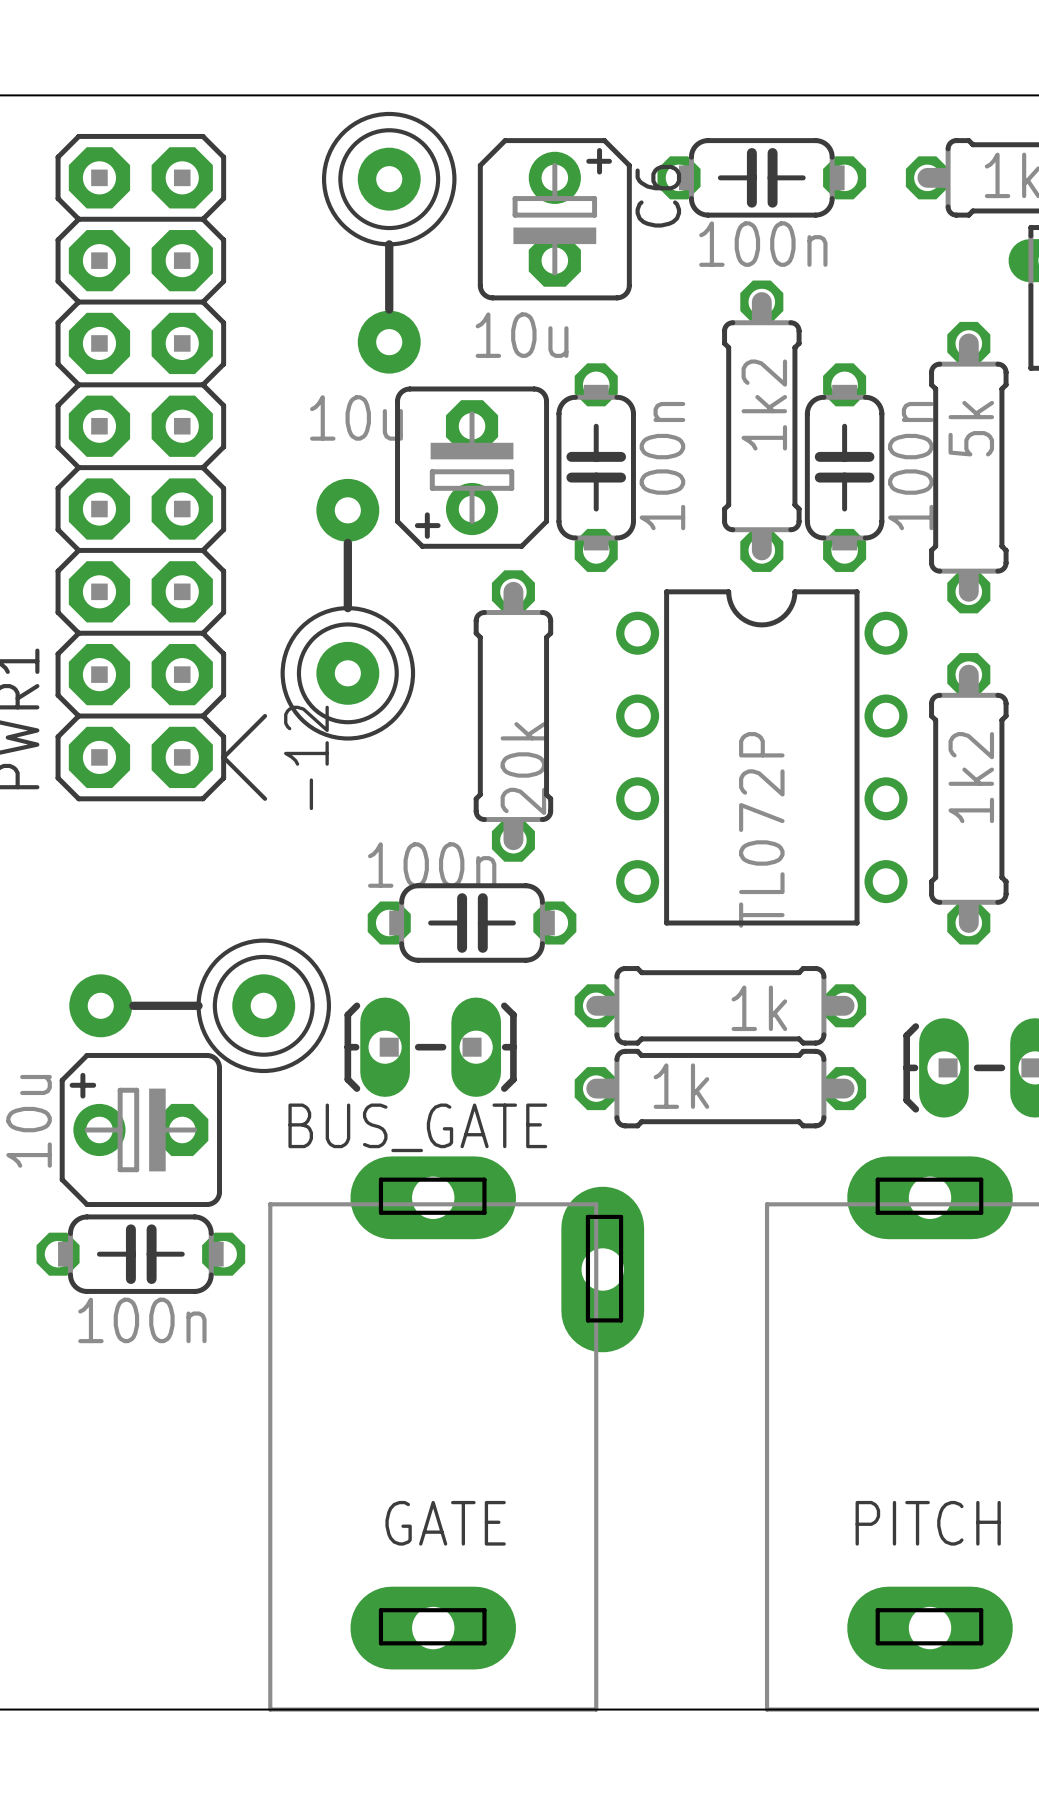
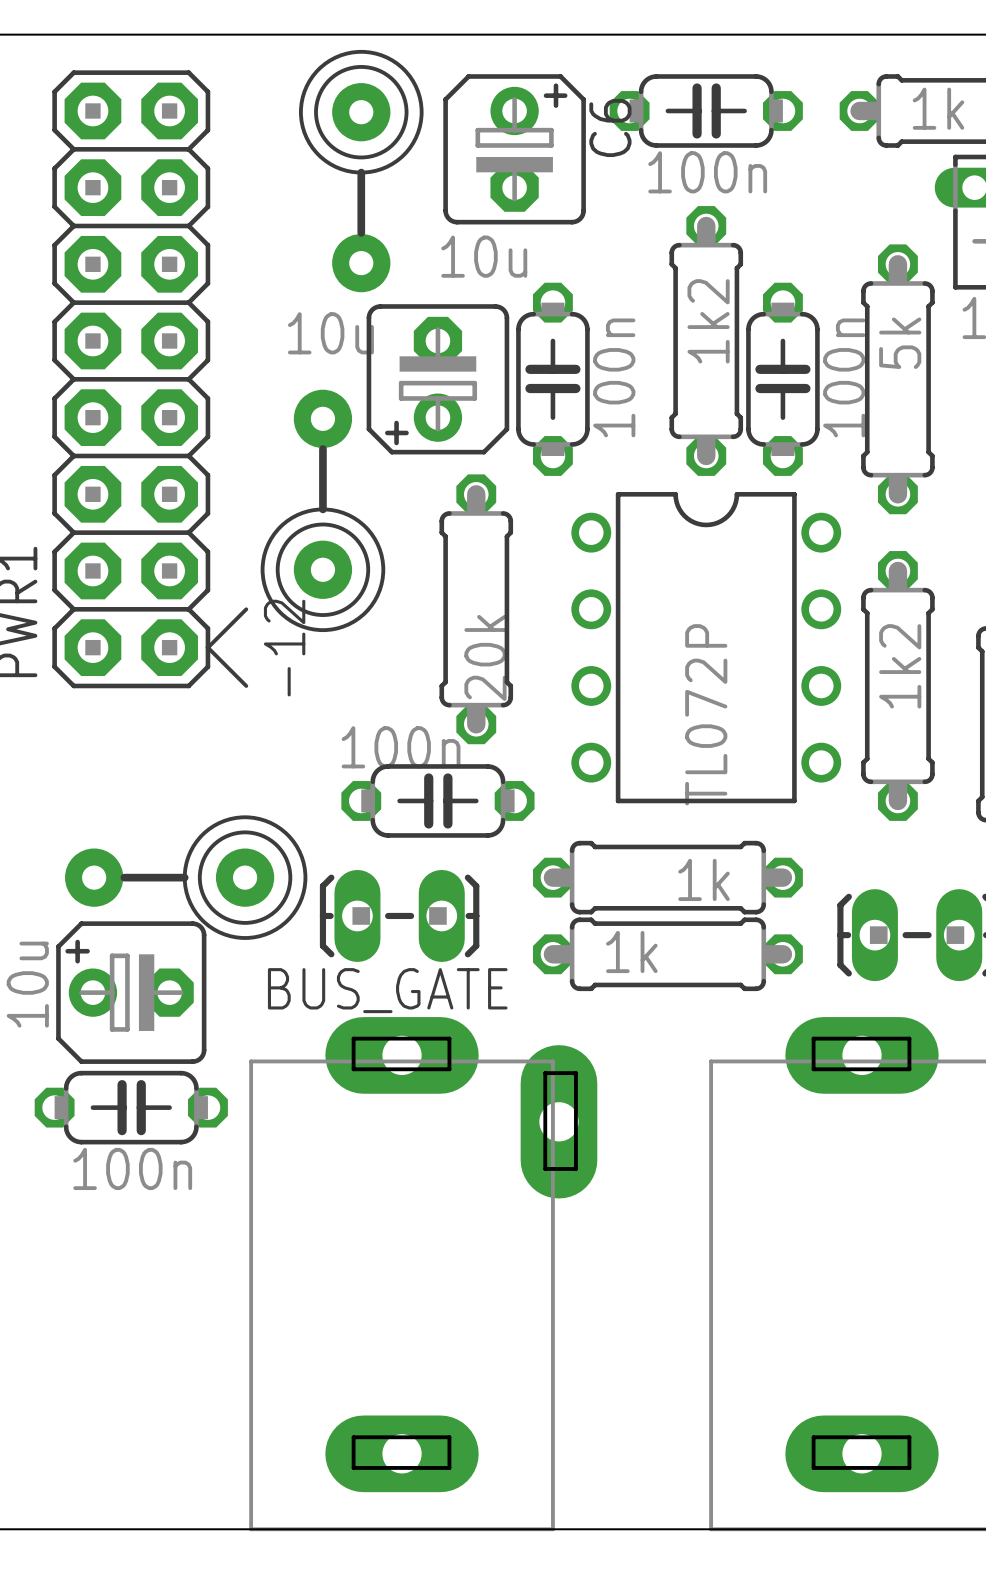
GATE name: GATE (445, 1523) -> none
PITCH name: PITCH (928, 1523) -> none

